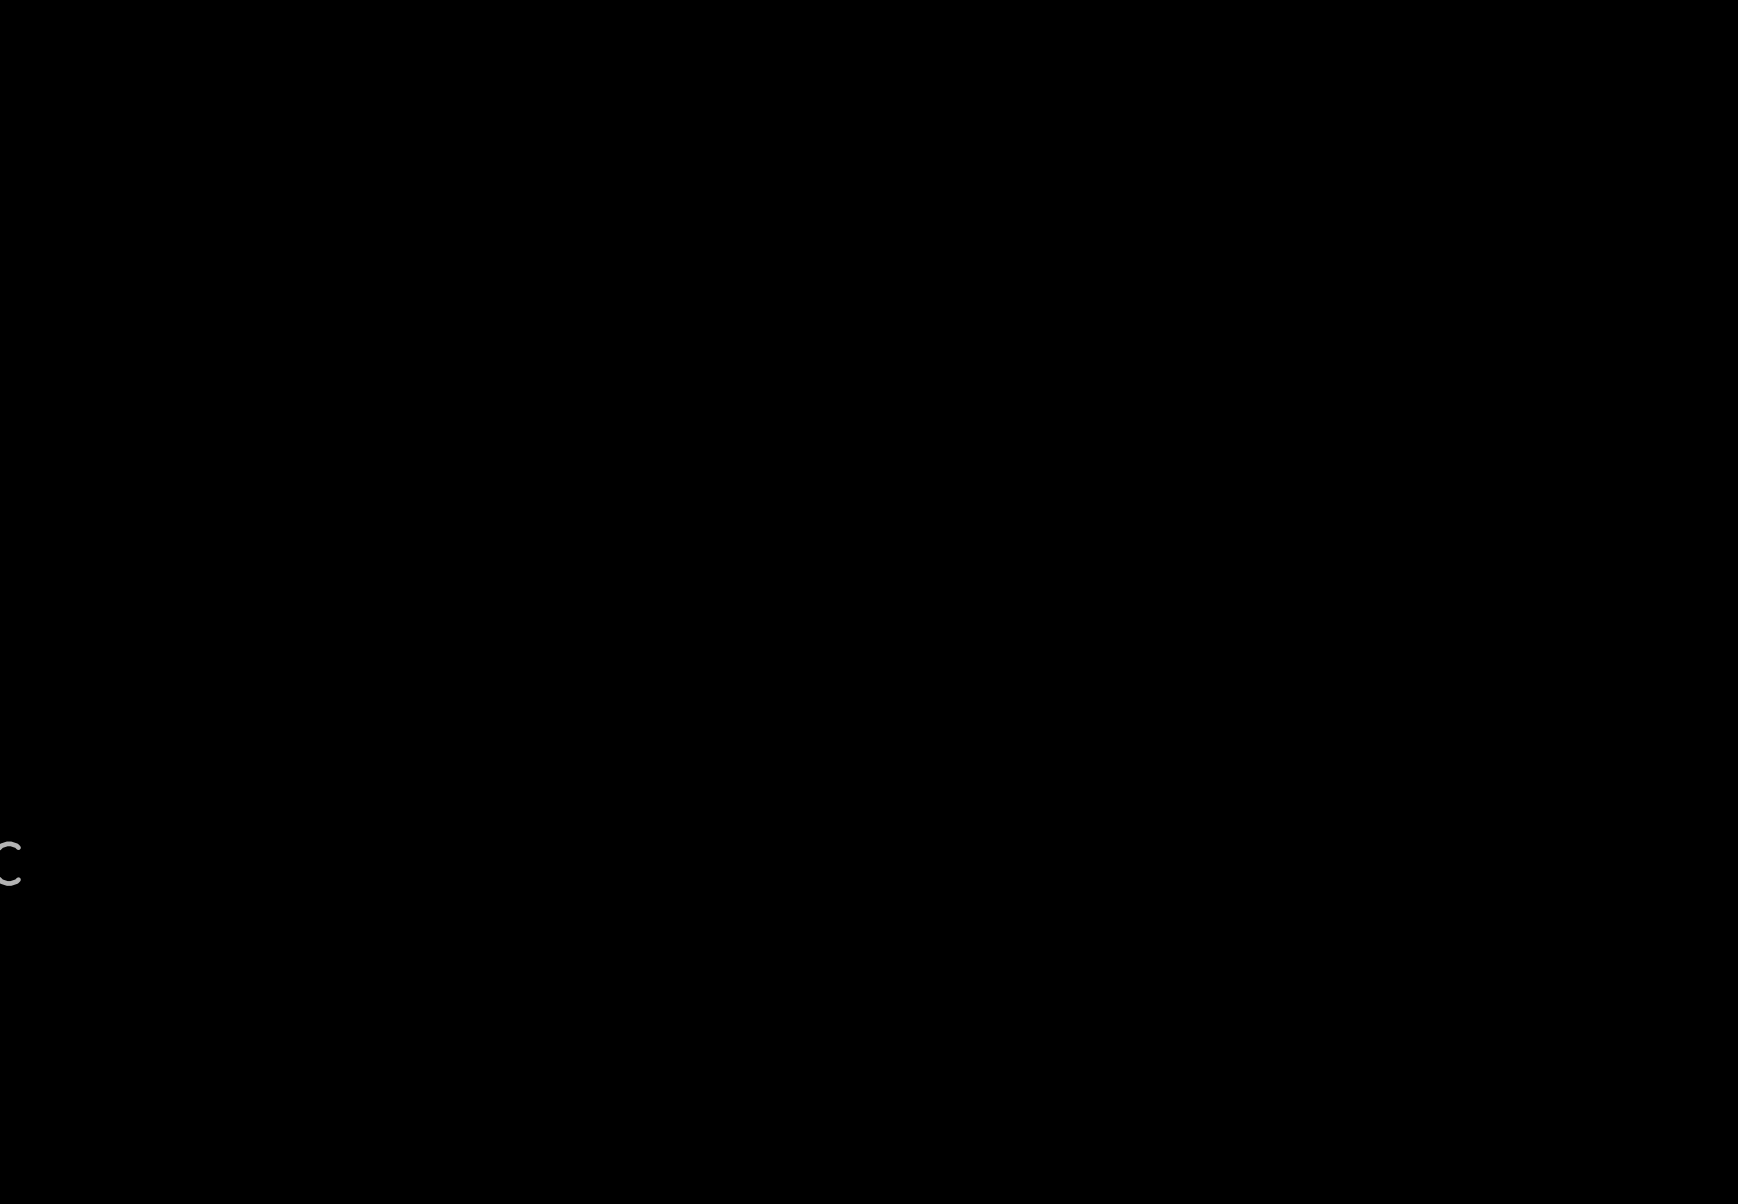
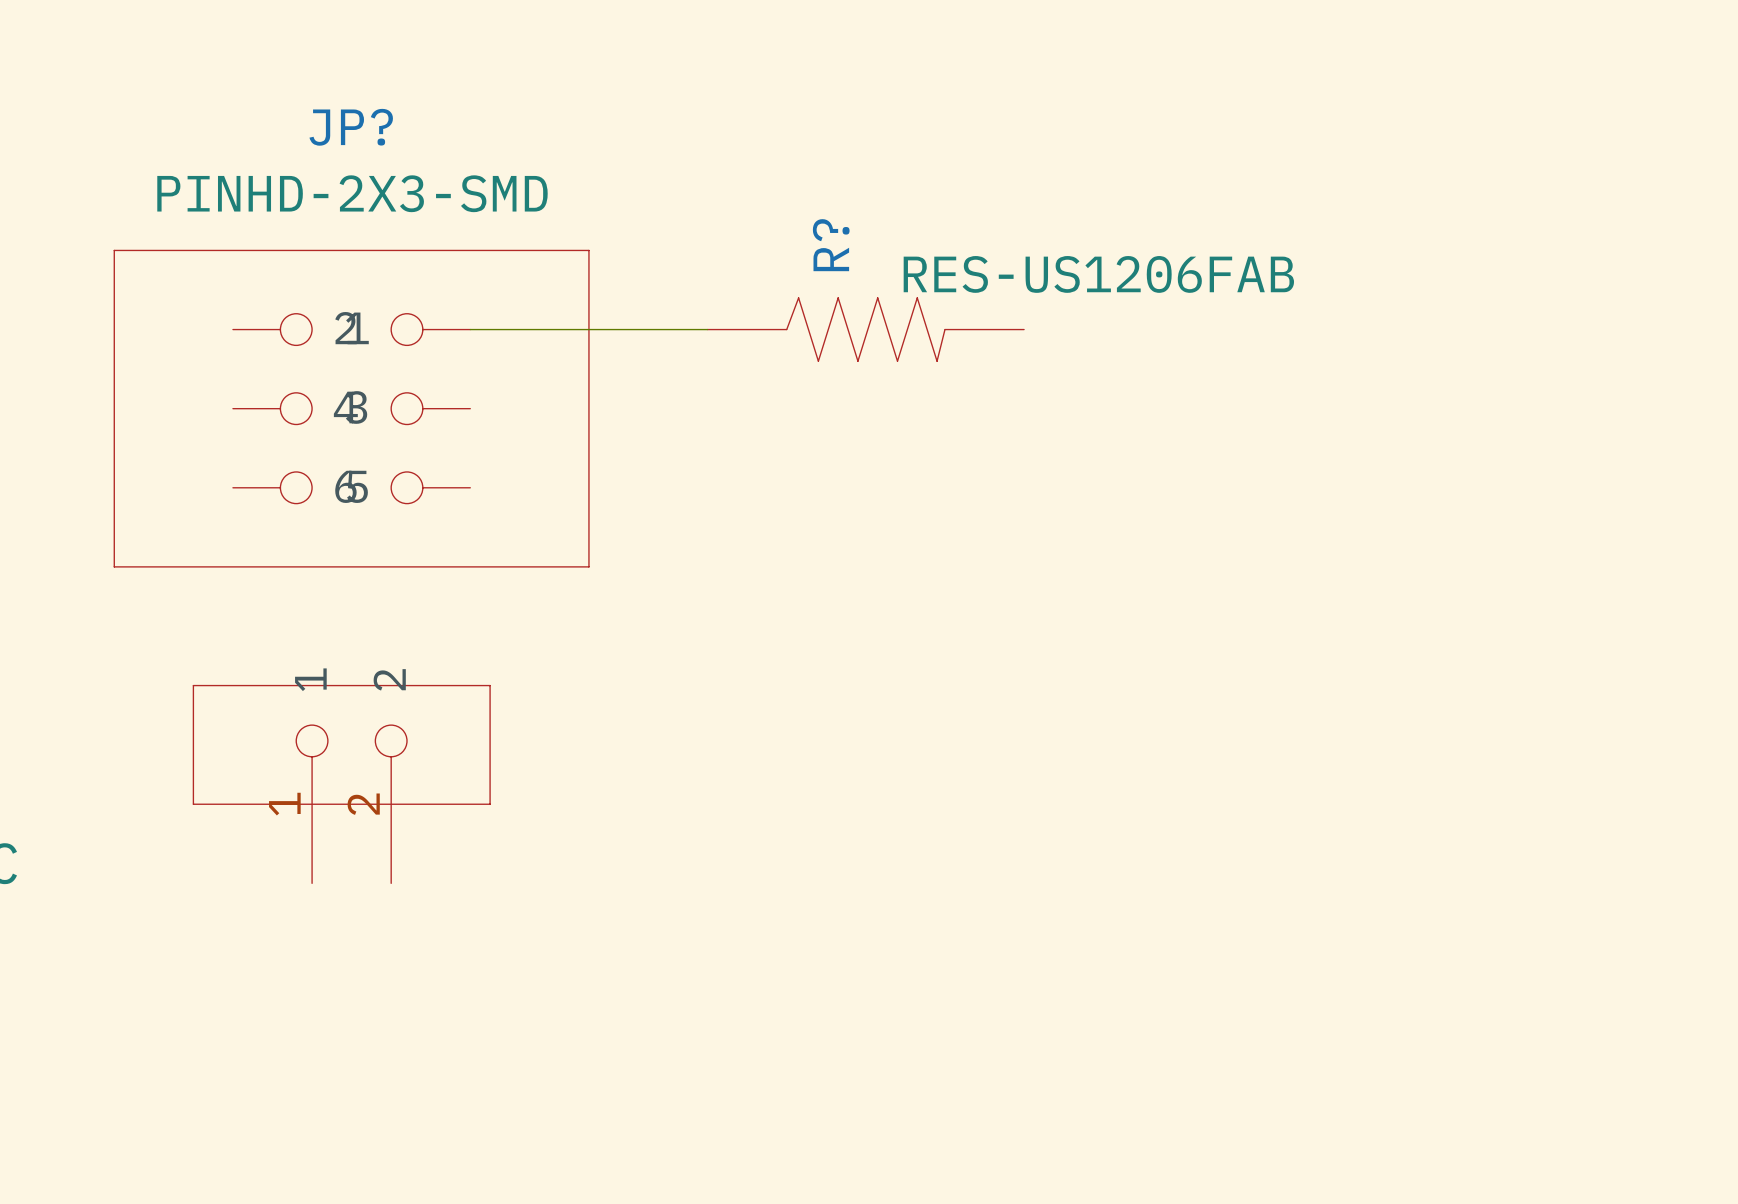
wire: none -> (470, 329) (707, 329)
R?: none -> RES-US1206FAB (865, 329)
JP?: none -> PINHD-2X3-SMD (351, 408)
part: none -> (341, 784)

